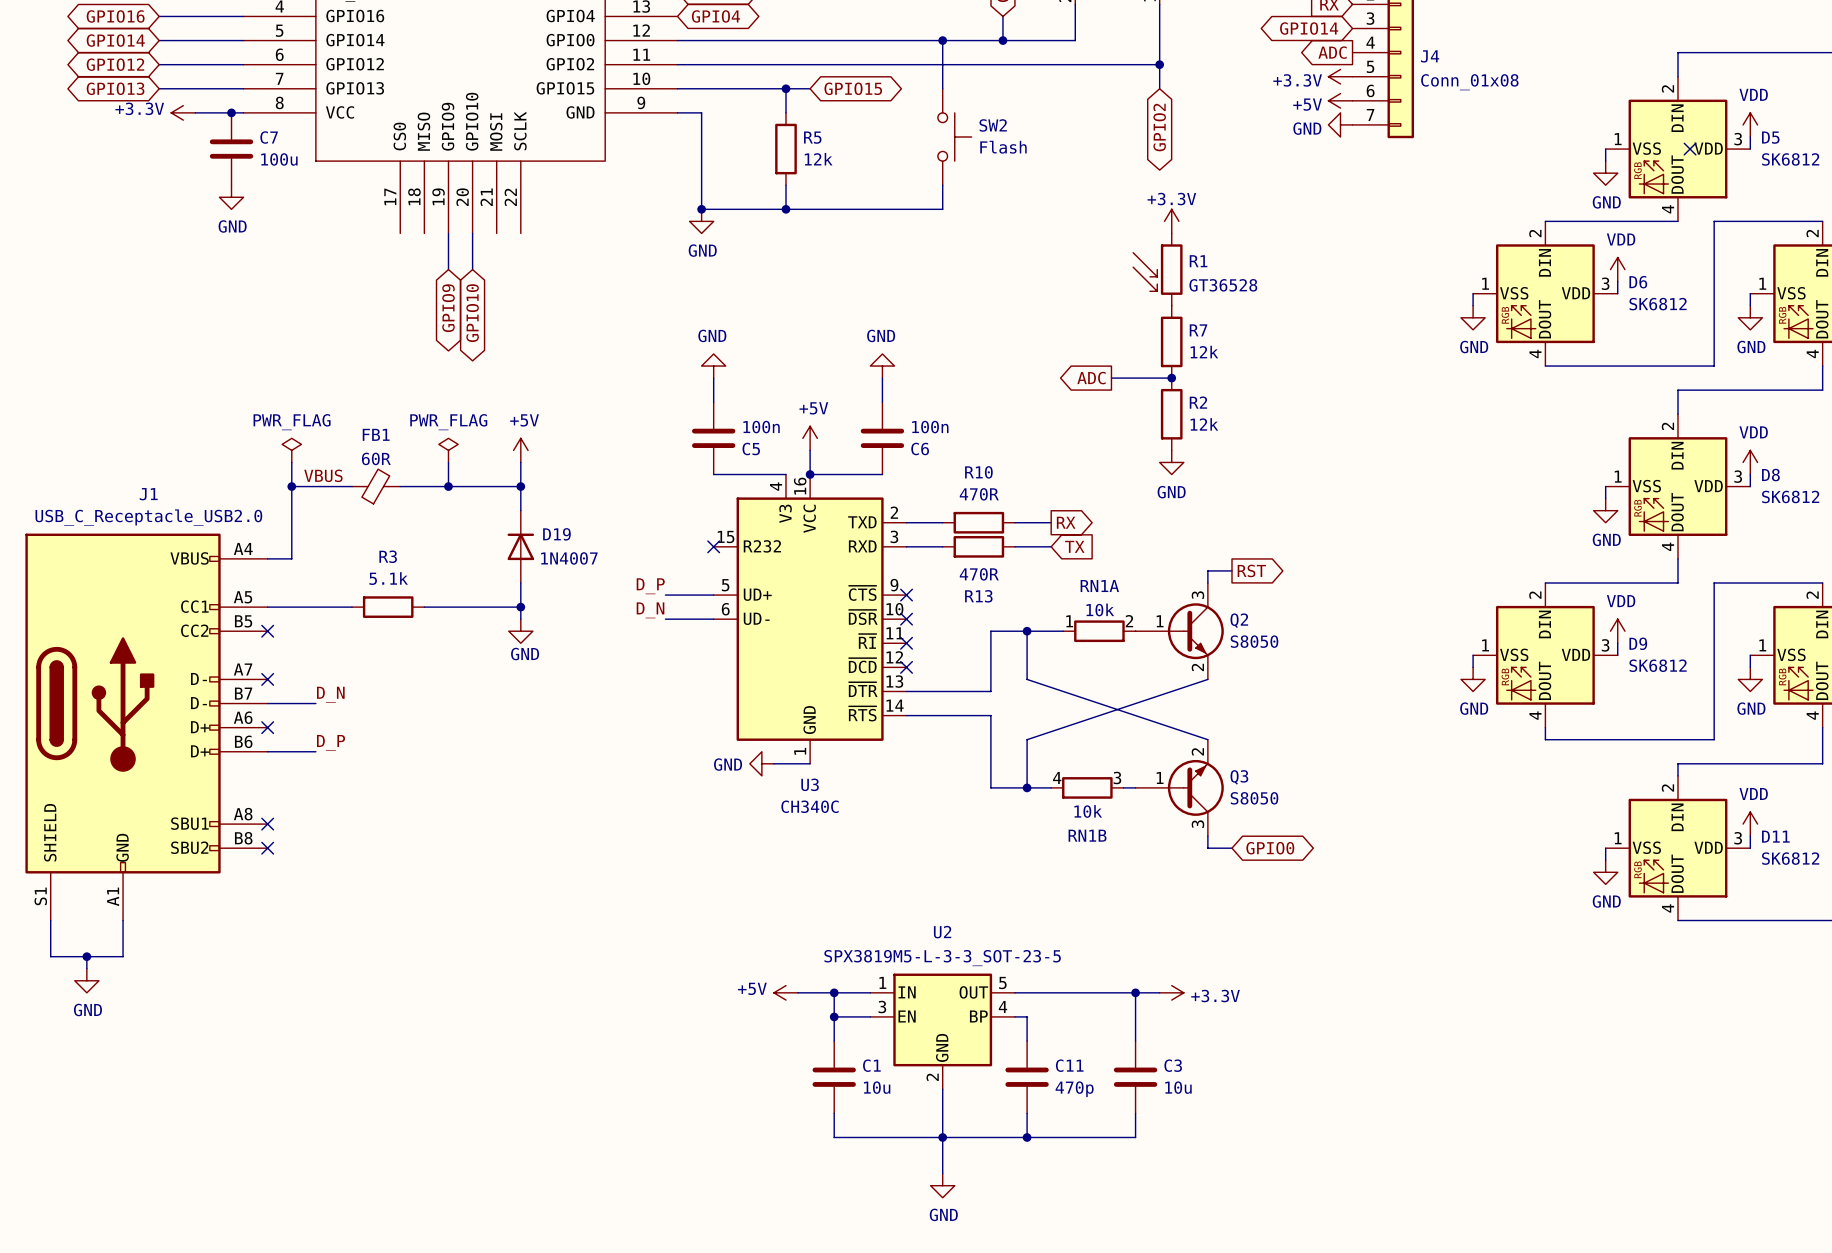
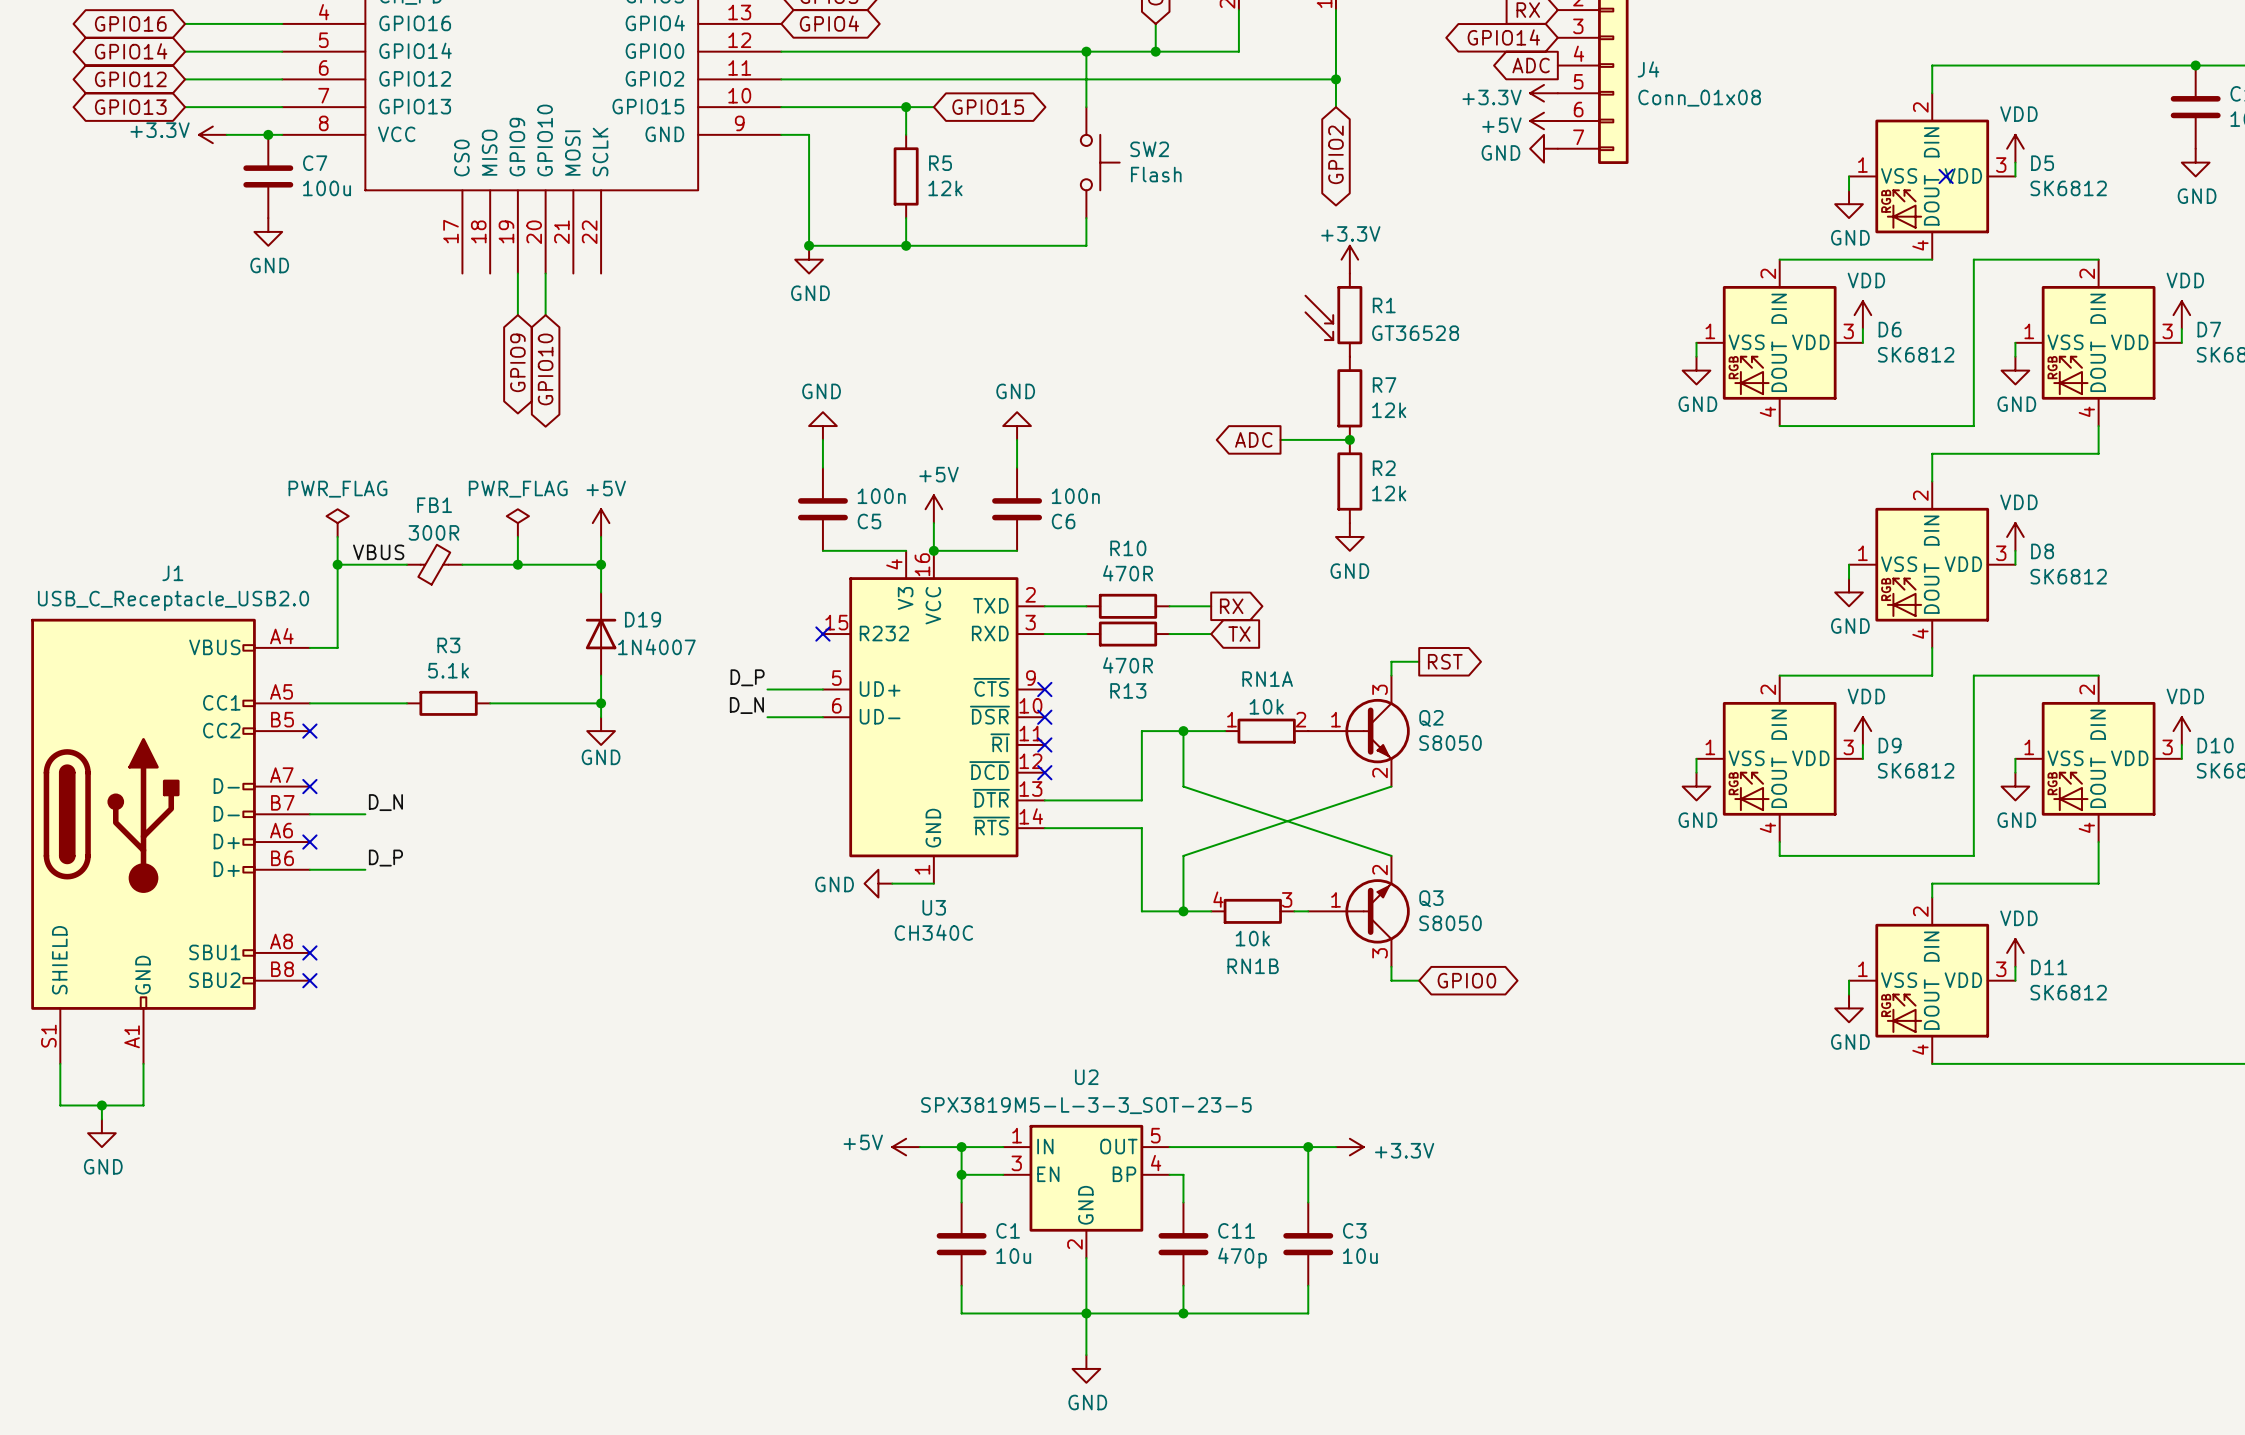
FB1 value: 60R (376, 458) -> 300R (433, 532)

